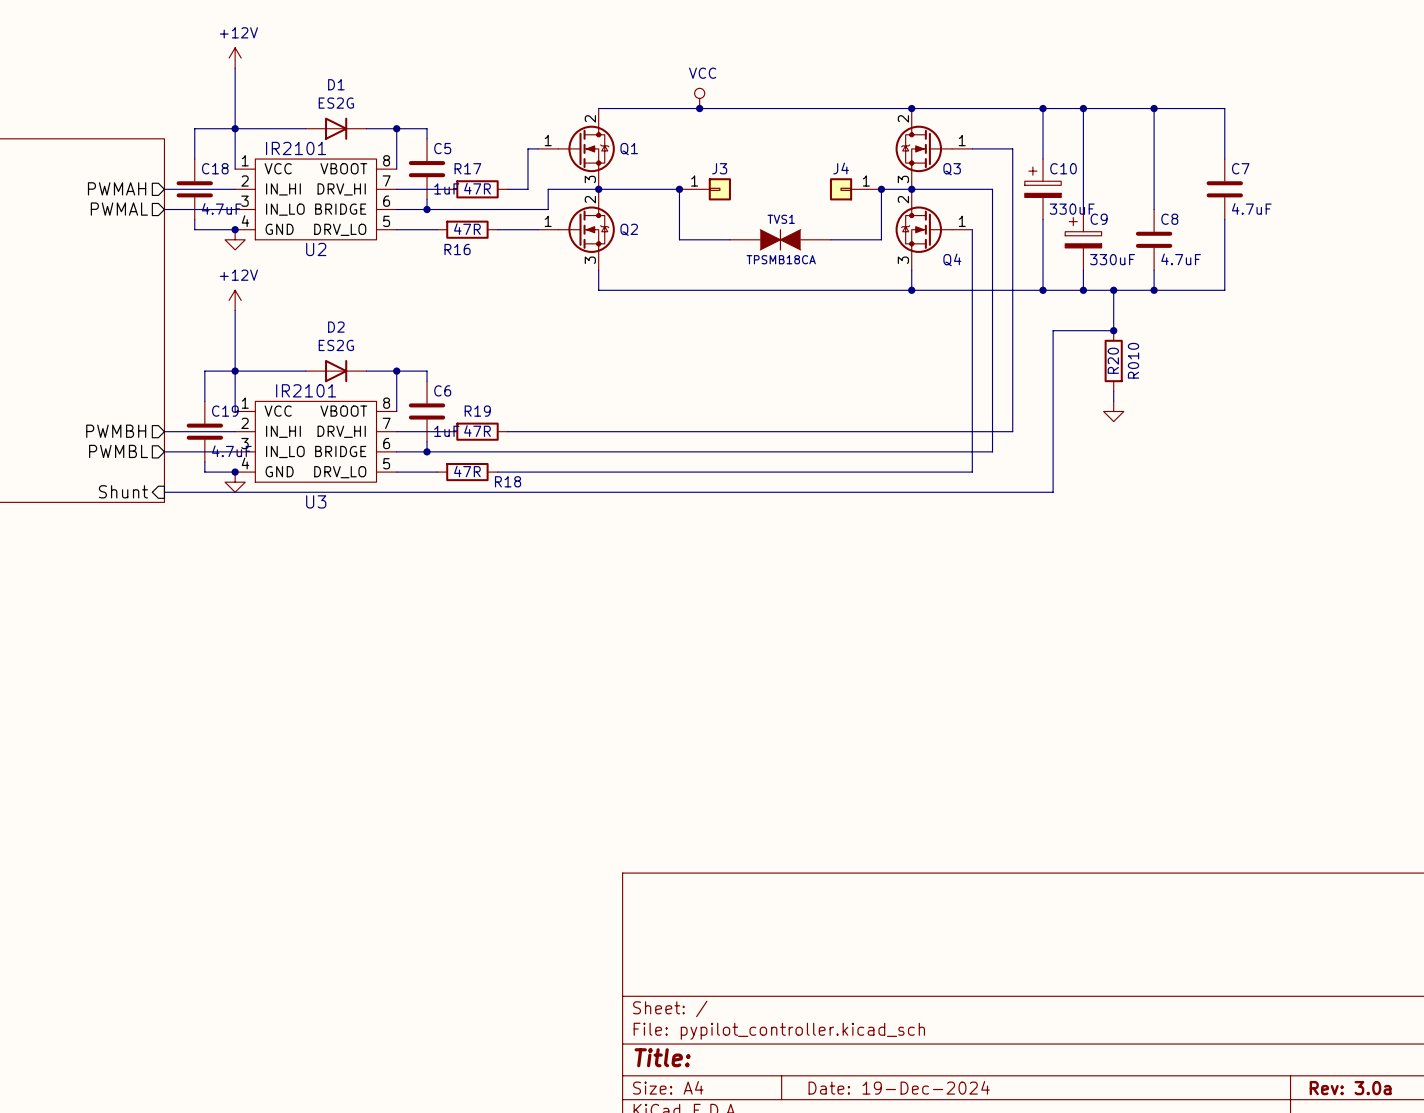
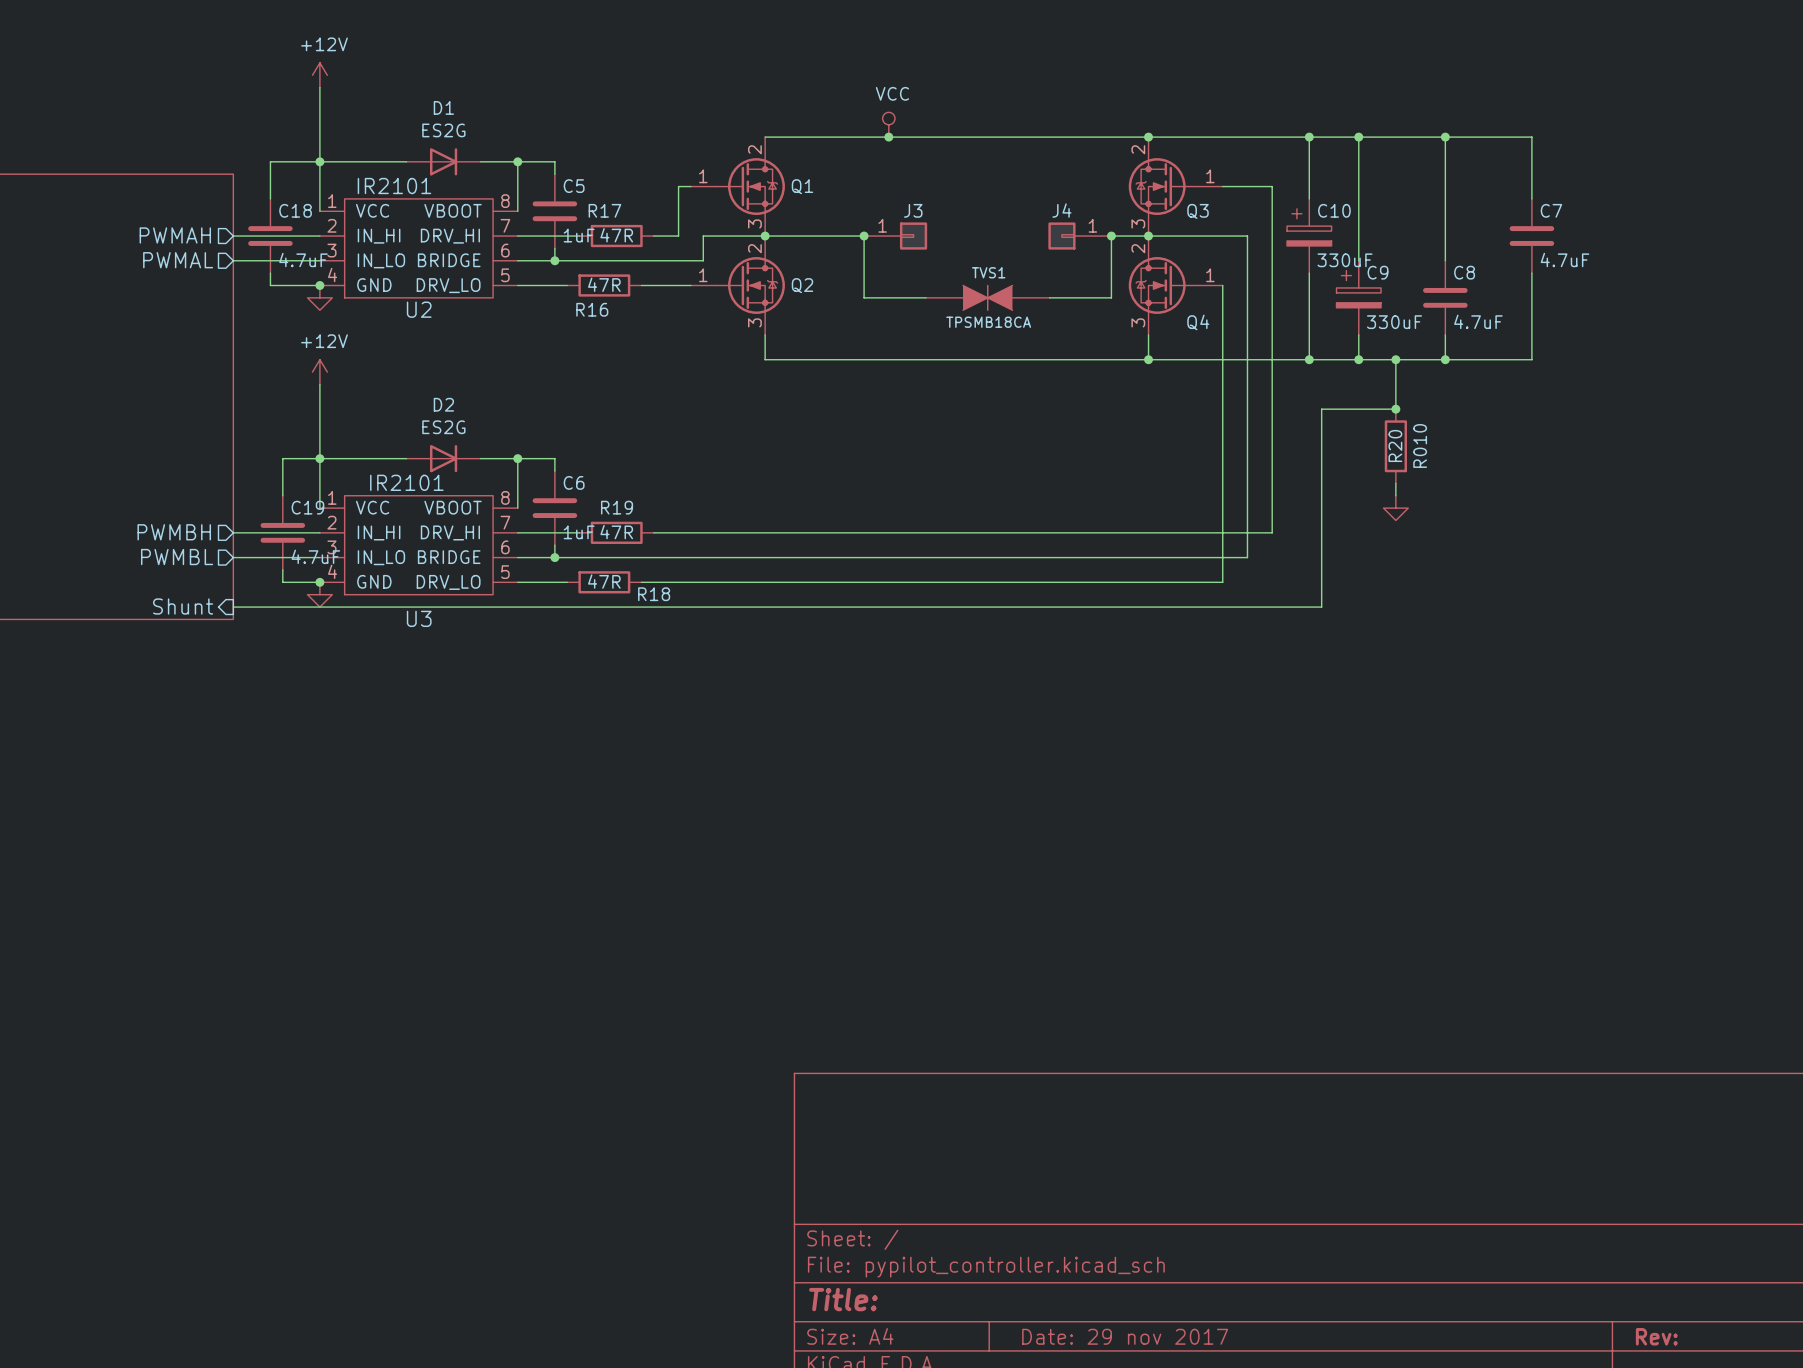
title block: Date: 19-Dec-2024 (899, 1087) -> Date: 29 nov 2017 (1125, 1336)
title block: Rev: 3.0a (1350, 1088) -> Rev: (1656, 1336)

